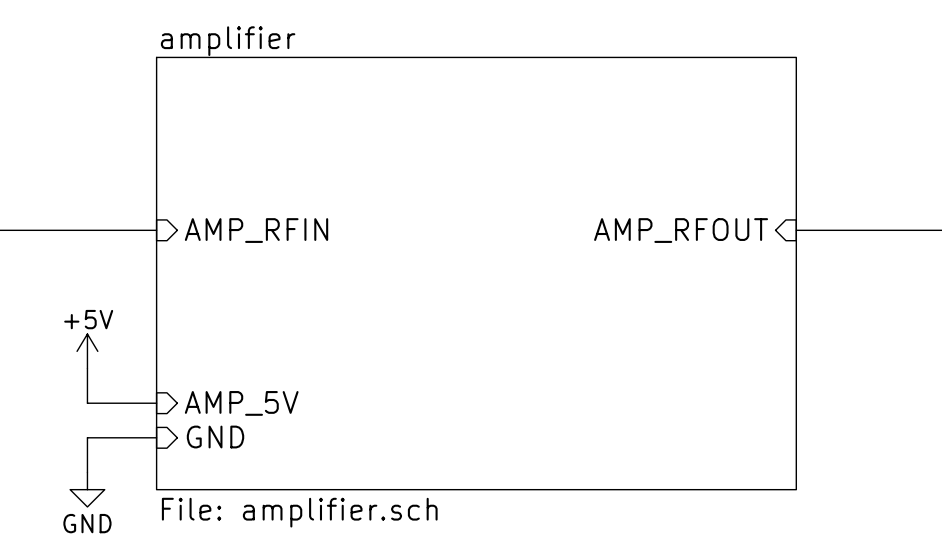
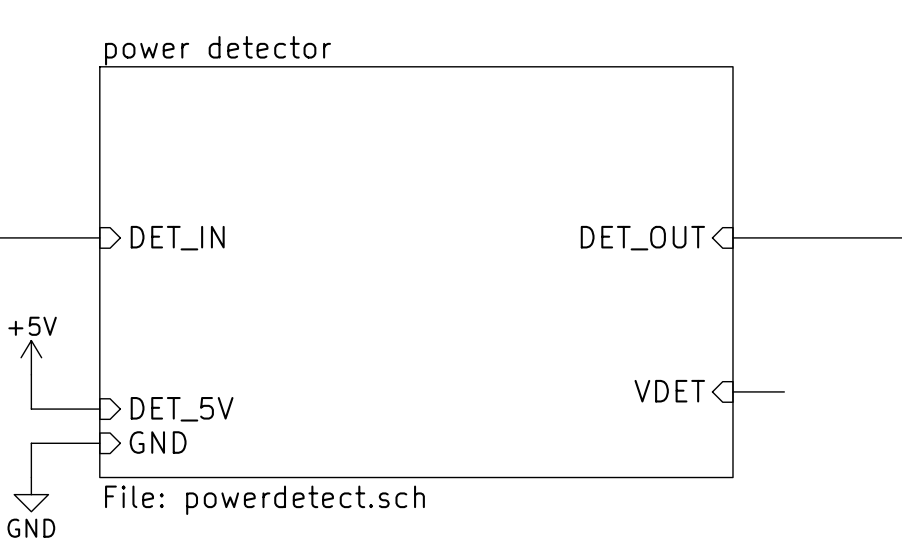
sheet pin: AMP_RFIN (256, 230) -> DET_IN (177, 238)
sheet pin: AMP_RFOUT (681, 230) -> DET_OUT (642, 238)
sheet power detector: none -> File: powerdetect.sch (416, 272)
sheet amplifier: File: amplifier.sch (476, 273) -> none
sheet pin: none -> VDET (669, 391)
wire: none -> (732, 391) (784, 391)
sheet pin: AMP_5V (241, 403) -> DET_5V (182, 409)

